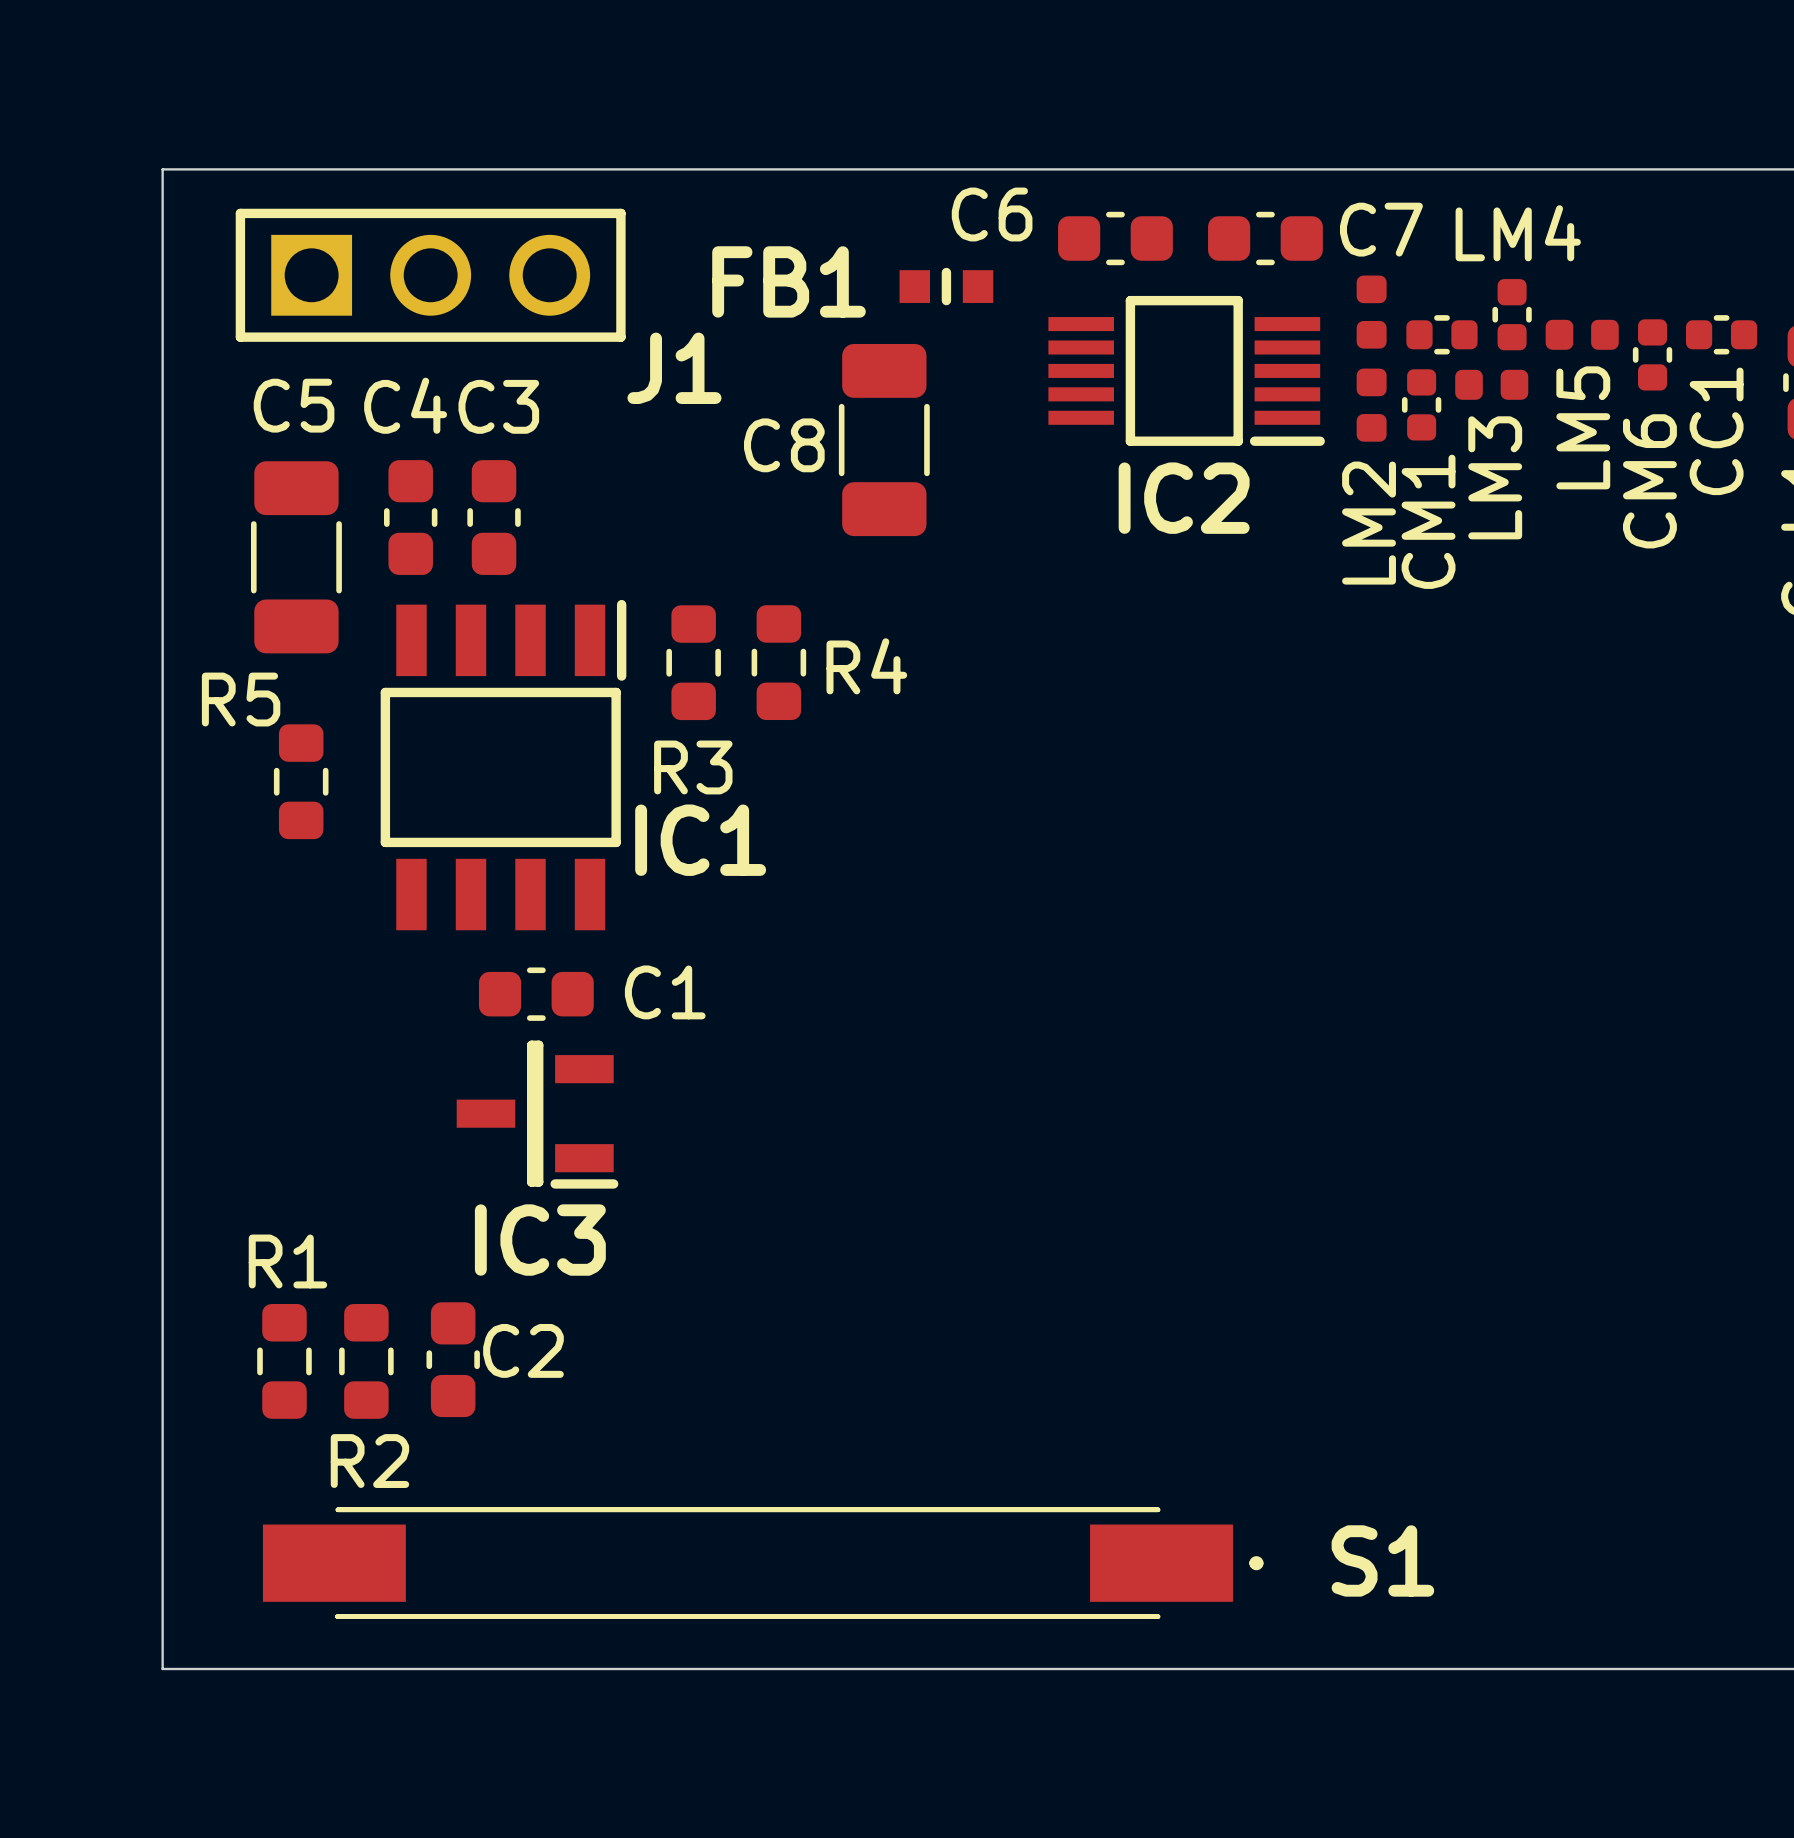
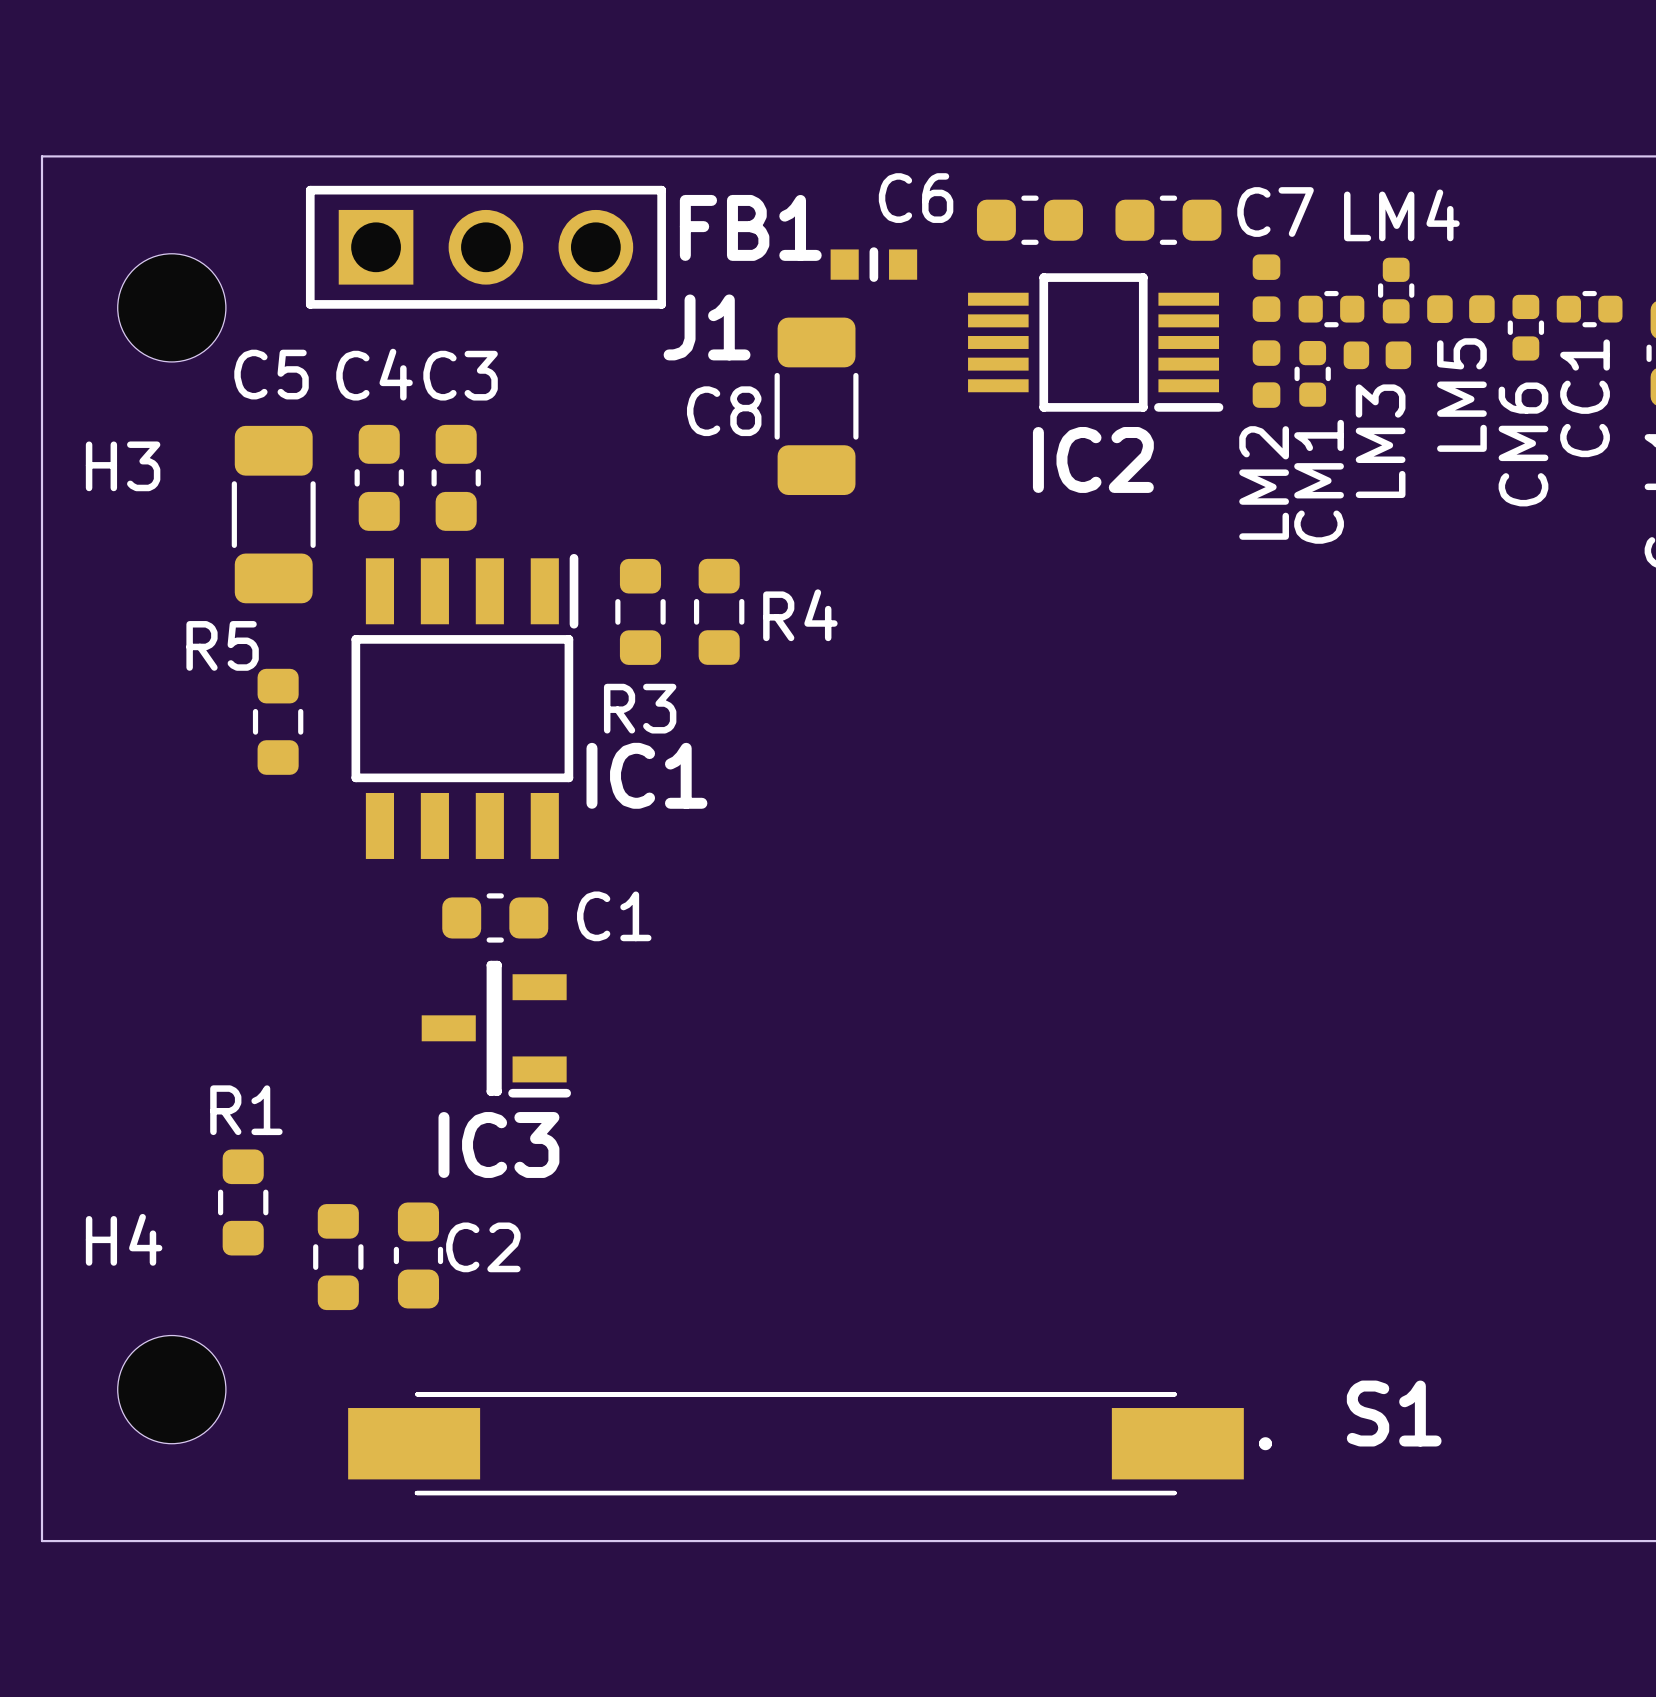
board edge: (162, 169) (162, 1668) -> (150, 156) (42, 156) (42, 1541) (150, 1541)
J1 position: (430, 275) -> (485, 247)
FB1 name position: FB1 (789, 281) -> FB1 (750, 227)
H3: none -> (171, 307)
J1 name position: J1 (674, 368) -> J1 (707, 327)
R1 position: (284, 1361) -> (243, 1202)
R2 name: R2 (369, 1461) -> none
H4: none -> (171, 1389)
S1 name position: S1 (1382, 1560) -> S1 (1394, 1413)
S1 position: (763, 1563) -> (810, 1443)

